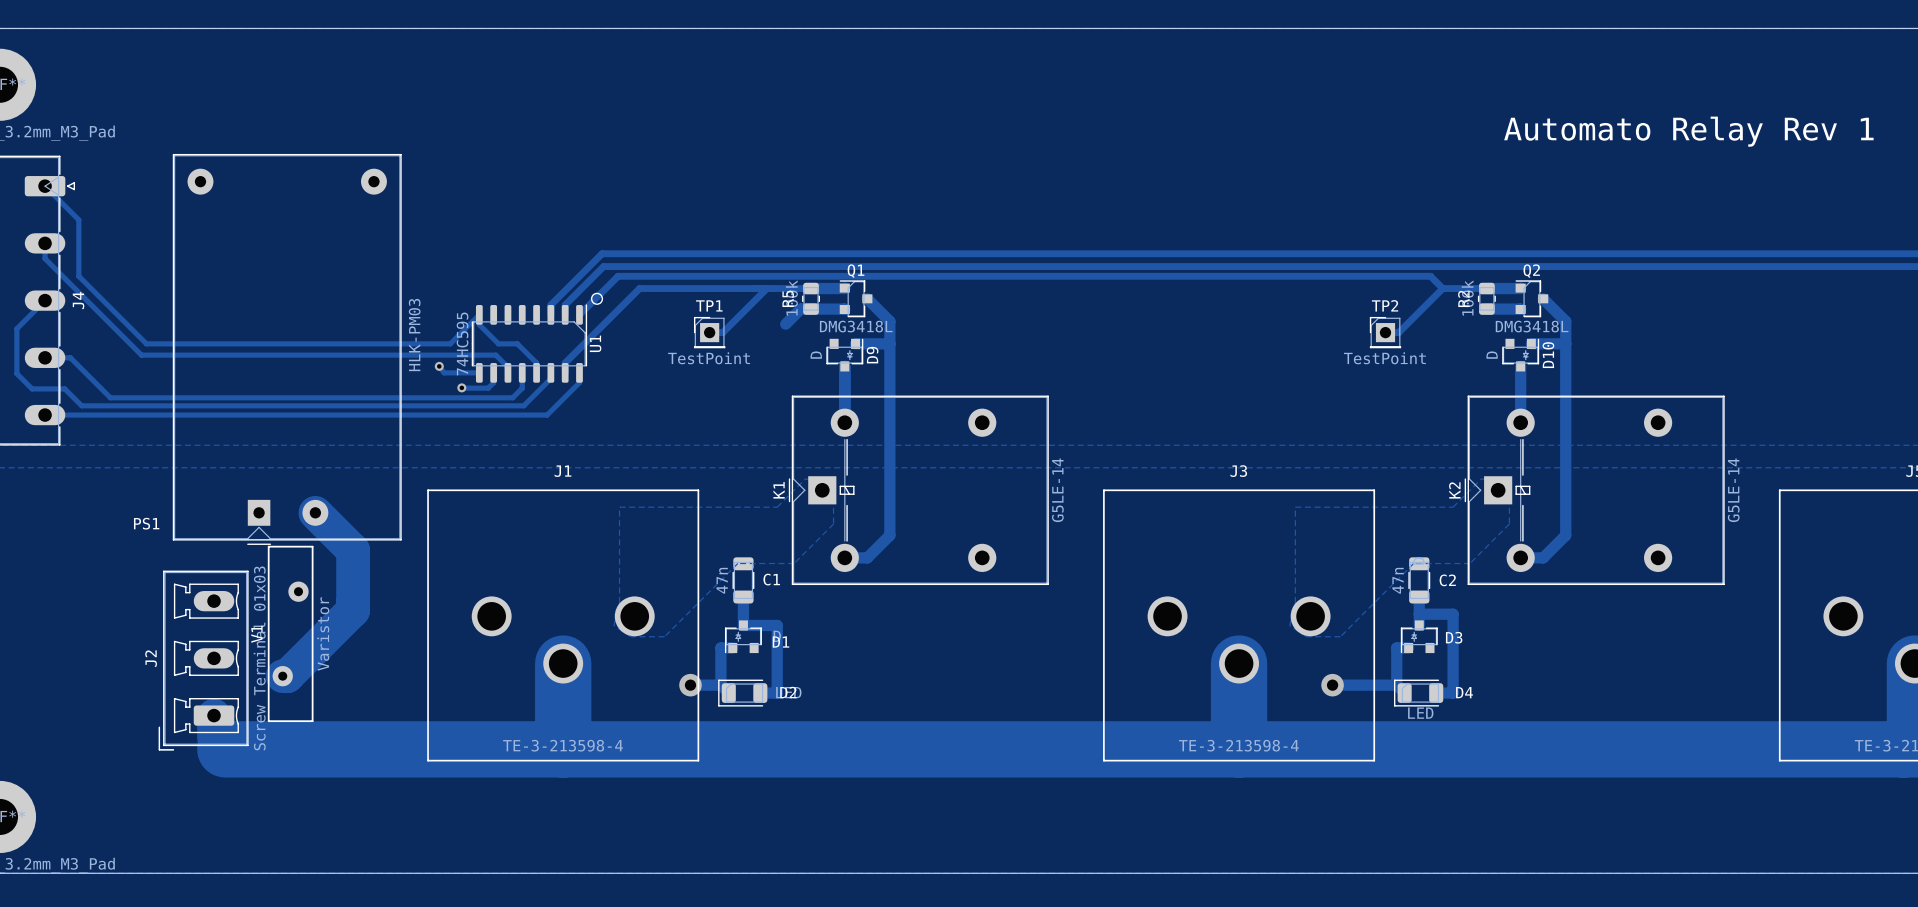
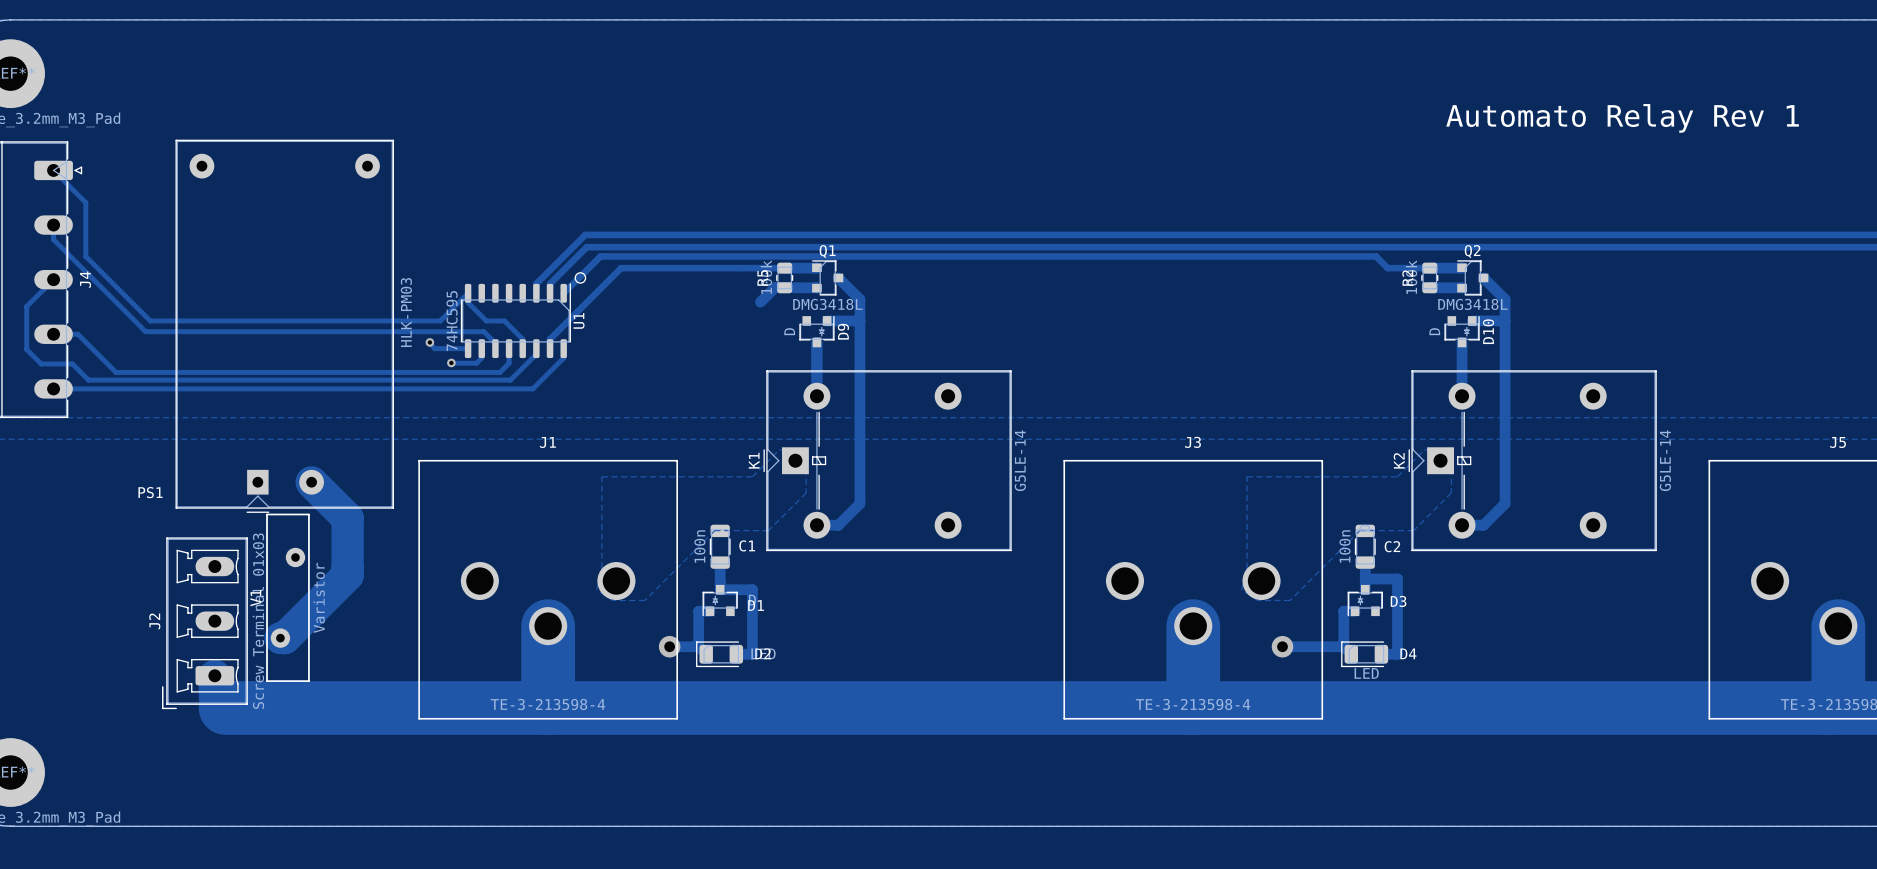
track: (766, 288) (722, 332) (709, 332) -> none
track: (1442, 288) (1398, 332) (1385, 332) -> none
TP1: TestPoint (709, 332) -> none
TP2: TestPoint (1385, 332) -> none
C1 value: 47n (722, 580) -> 100n (699, 546)
C2 value: 47n (1398, 580) -> 100n (1345, 546)

